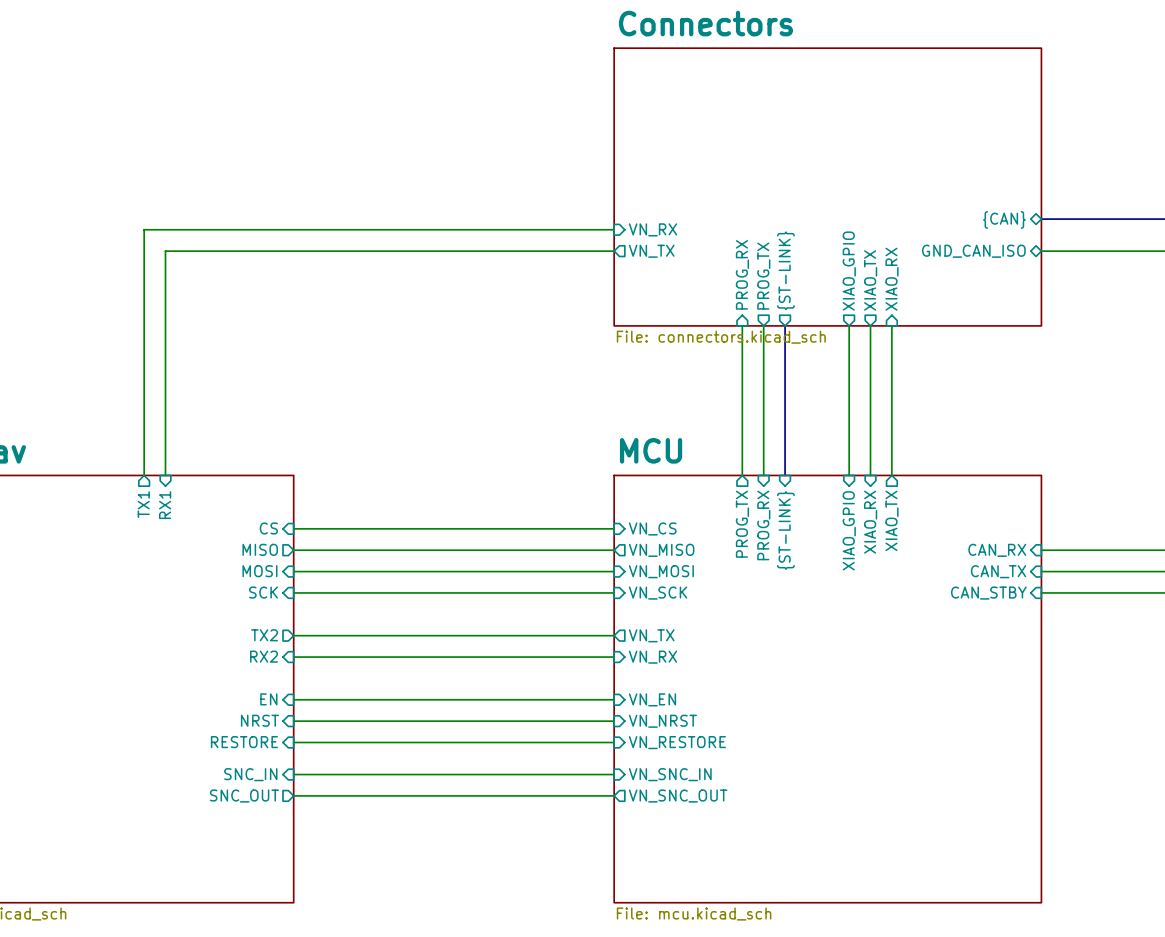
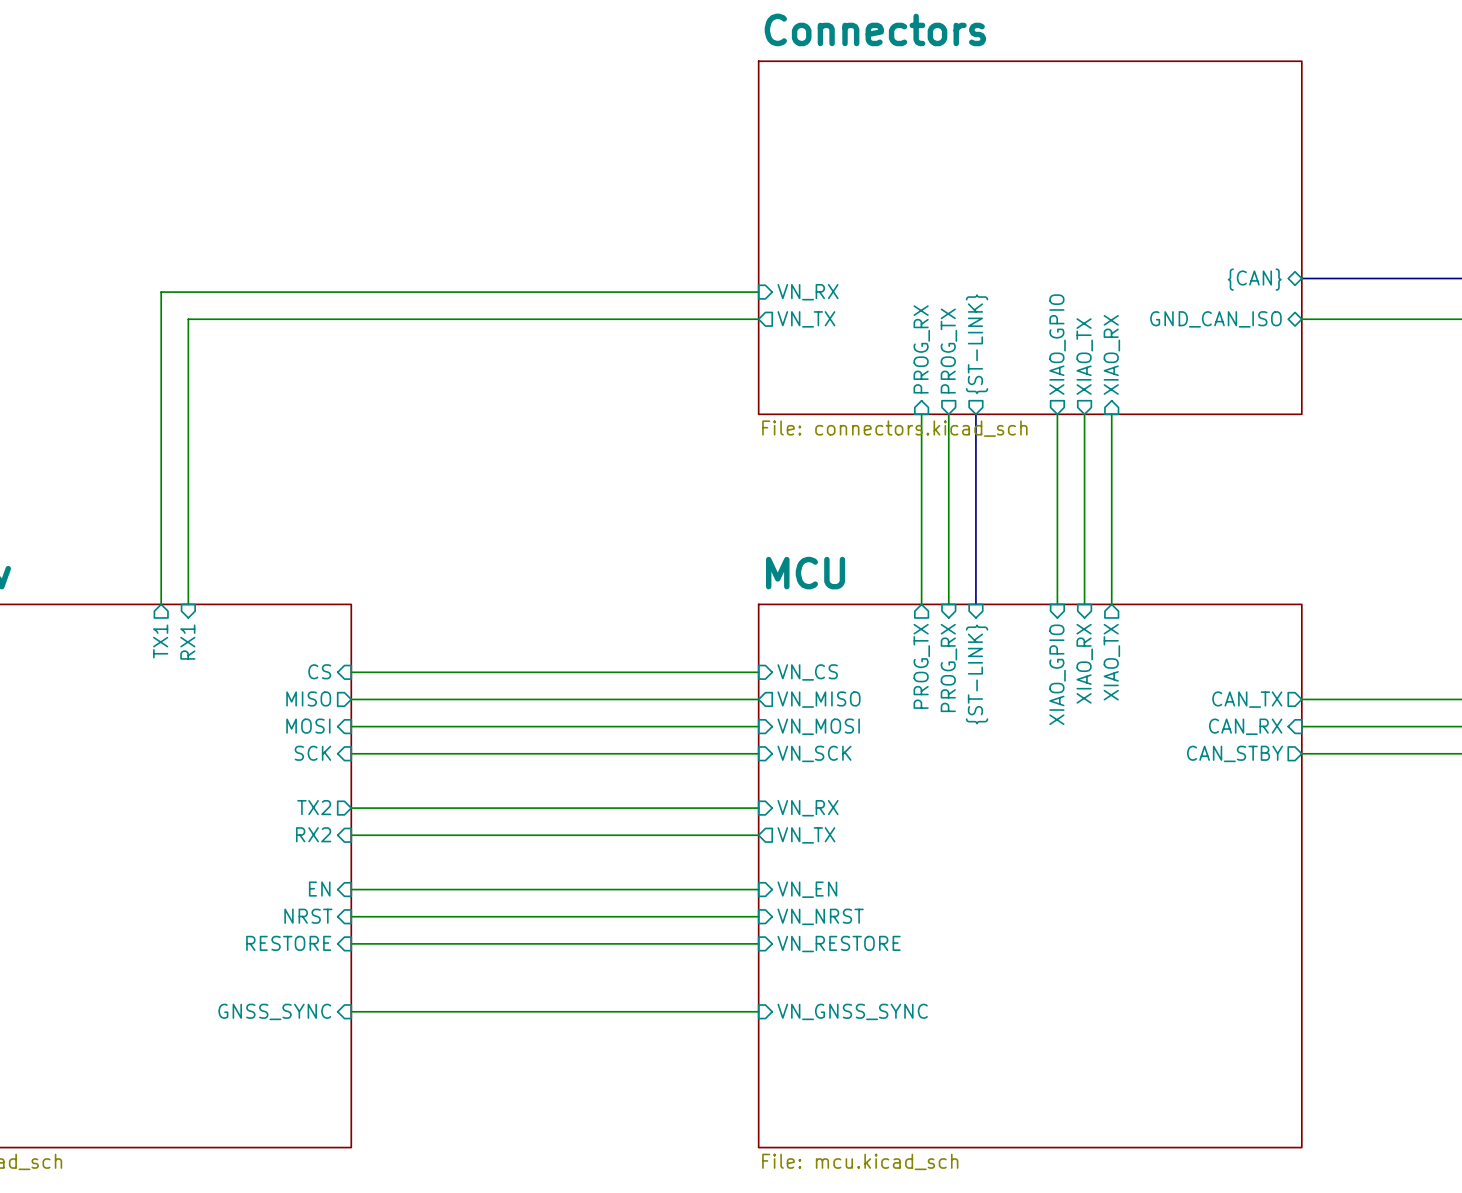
sheet pin shape: input (997, 550) -> output (1247, 699)
sheet pin: CAN_RX (997, 550) -> CAN_TX (1247, 699)
sheet pin: CAN_TX (998, 571) -> CAN_RX (1245, 726)
sheet pin shape: input (988, 593) -> output (1235, 753)
sheet pin shape: output (651, 635) -> input (808, 808)
sheet pin: VN_TX (651, 635) -> VN_RX (808, 808)
sheet pin shape: input (652, 657) -> output (806, 835)
sheet pin: VN_RX (652, 657) -> VN_TX (806, 835)
sheet pin: SNC_IN (250, 774) -> none
wire: (293, 774) (614, 774) -> none
sheet pin: VN_SNC_IN (670, 774) -> none
sheet pin shape: output (244, 796) -> input (274, 1011)
sheet pin: SNC_OUT (244, 796) -> GNSS_SYNC (274, 1011)
sheet pin shape: output (678, 796) -> input (852, 1011)
sheet pin: VN_SNC_OUT (678, 796) -> VN_GNSS_SYNC (852, 1011)

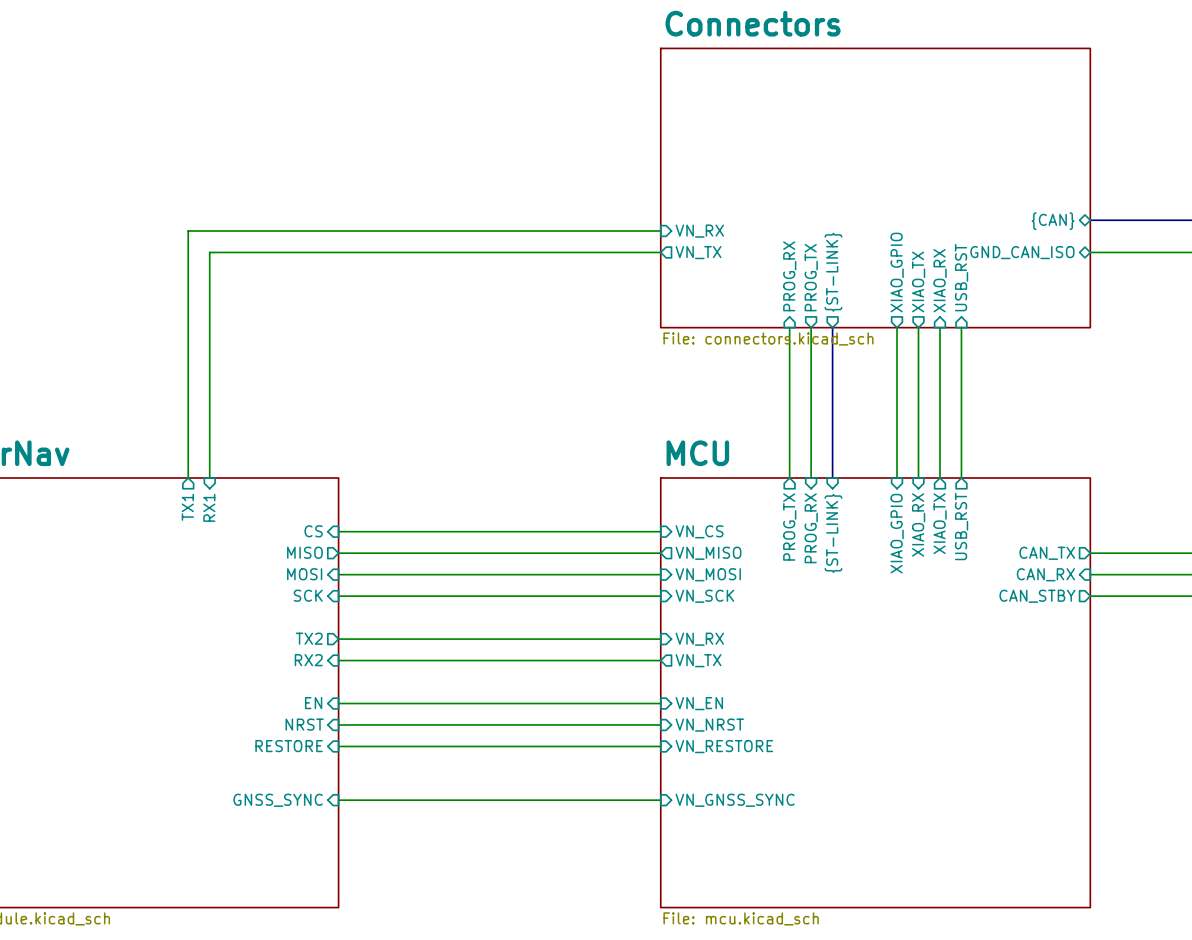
sheet pin: none -> USB_RST (961, 277)
wire: none -> (961, 327) (961, 477)
sheet pin: none -> USB_RST (961, 526)

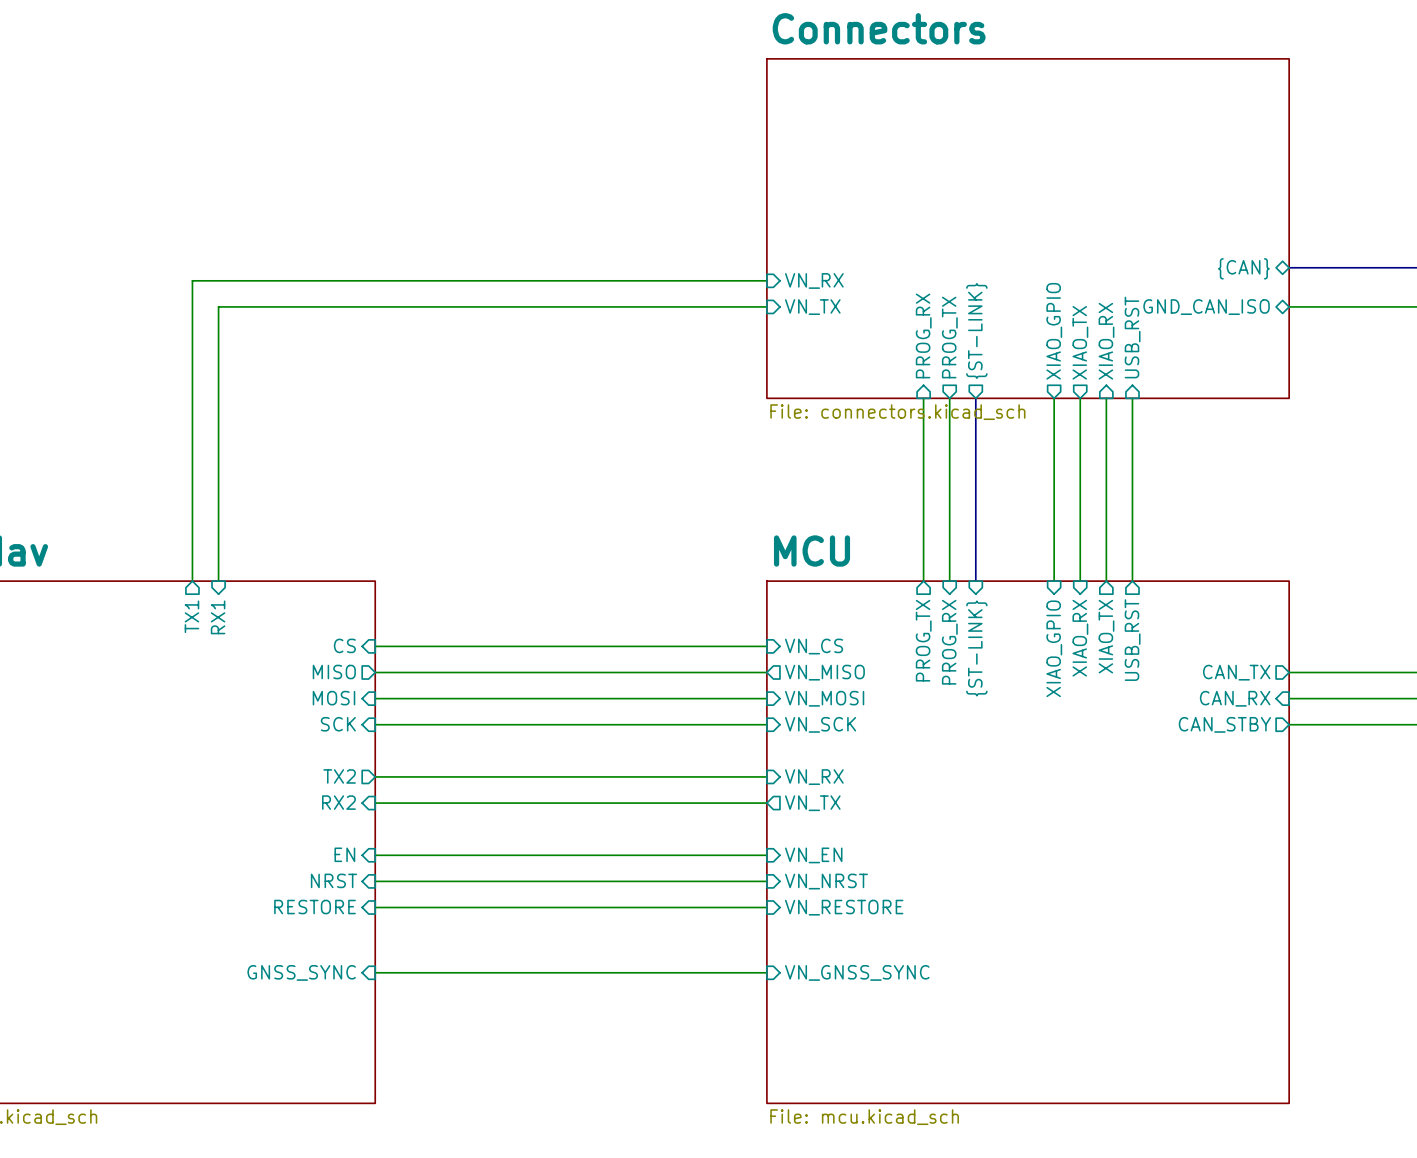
sheet pin shape: output (698, 252) -> input (812, 307)

